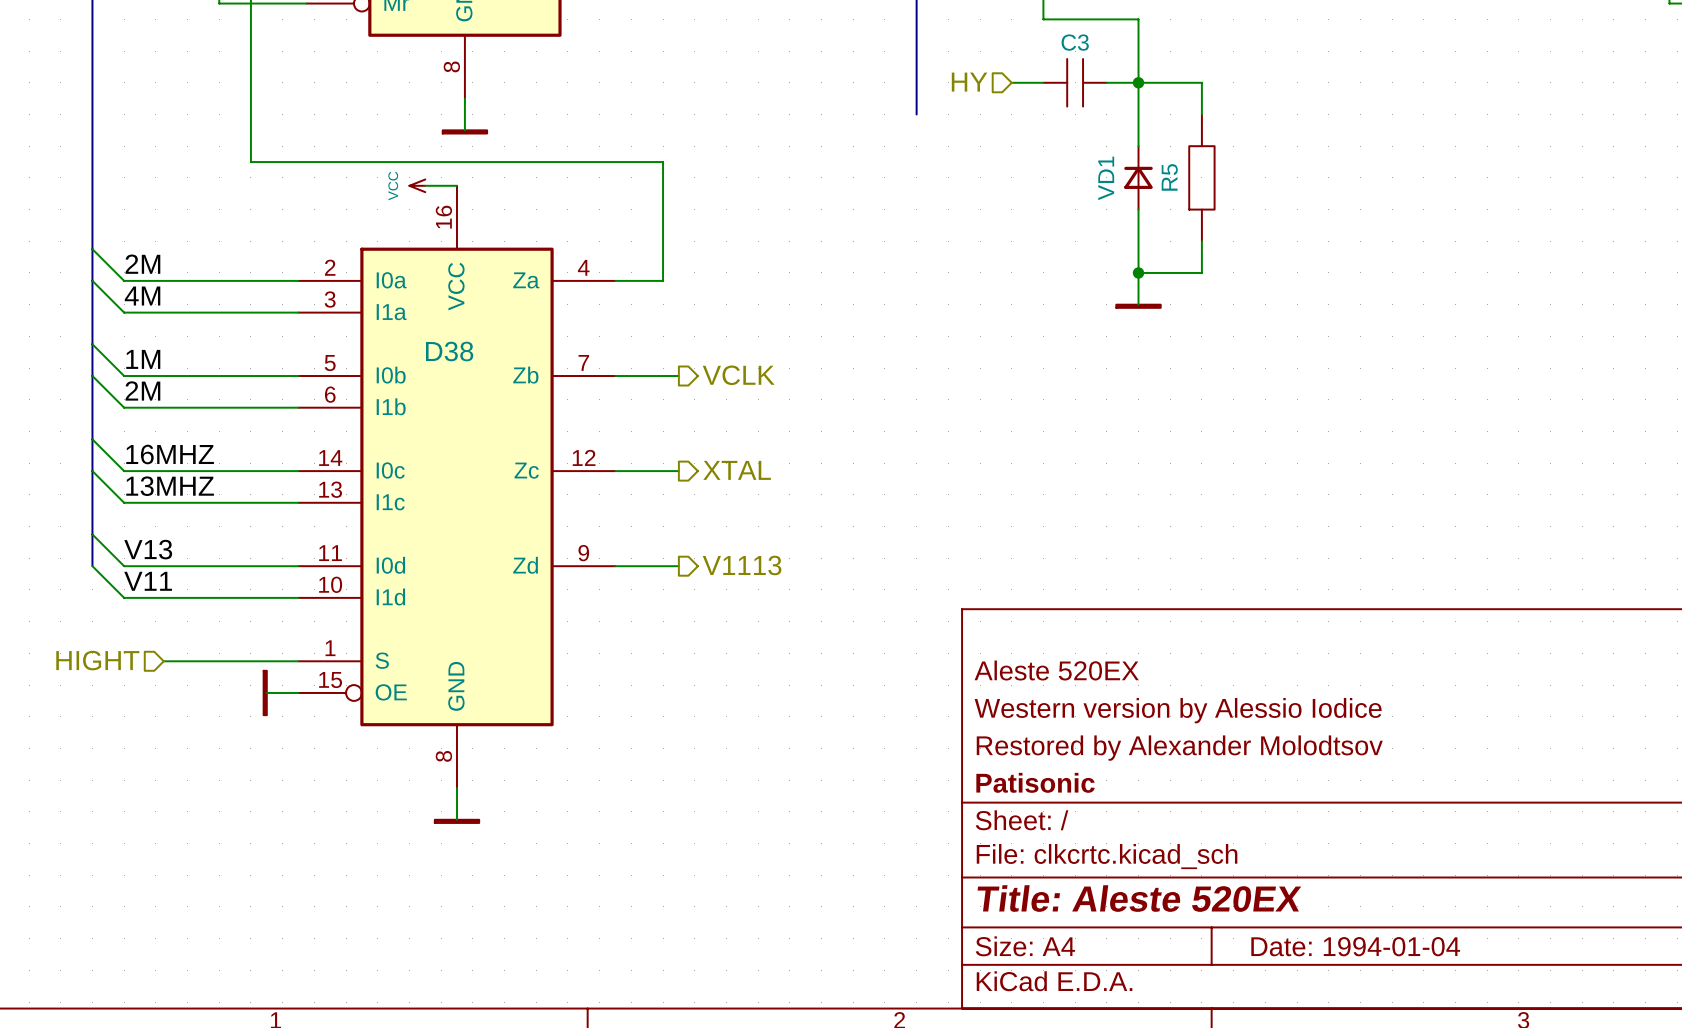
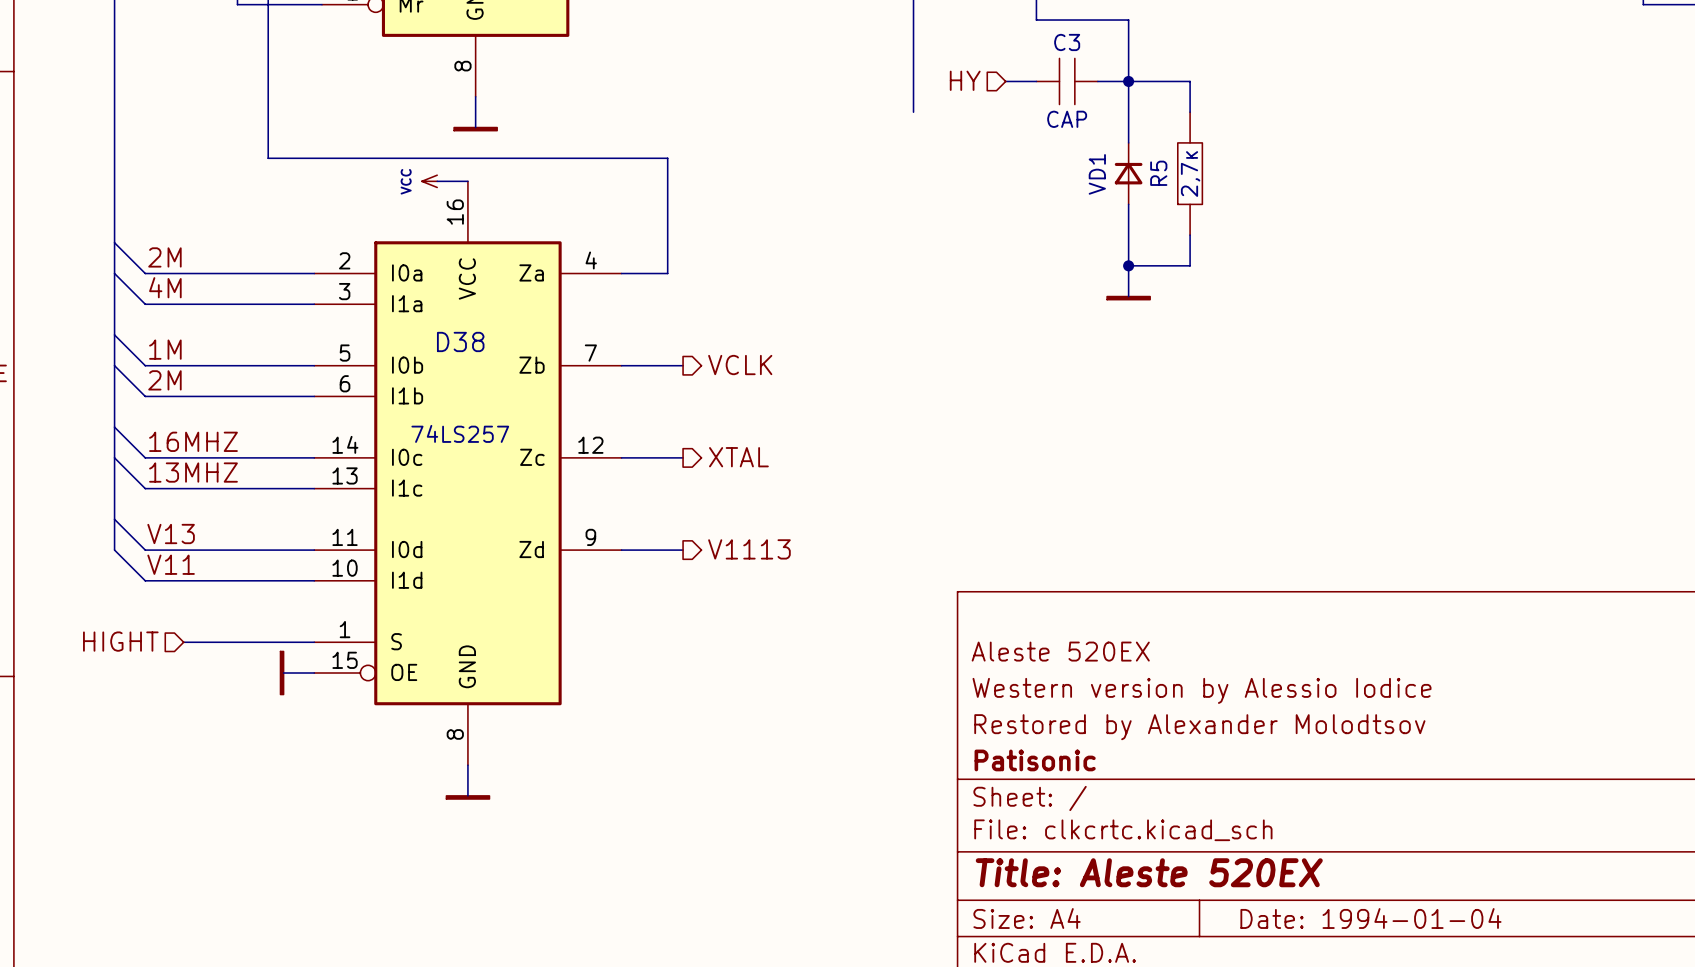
C3 value: none -> CAP (1067, 119)
R5 value: none -> 2,7к (1190, 174)
D38 value: none -> 74LS257 (460, 433)

